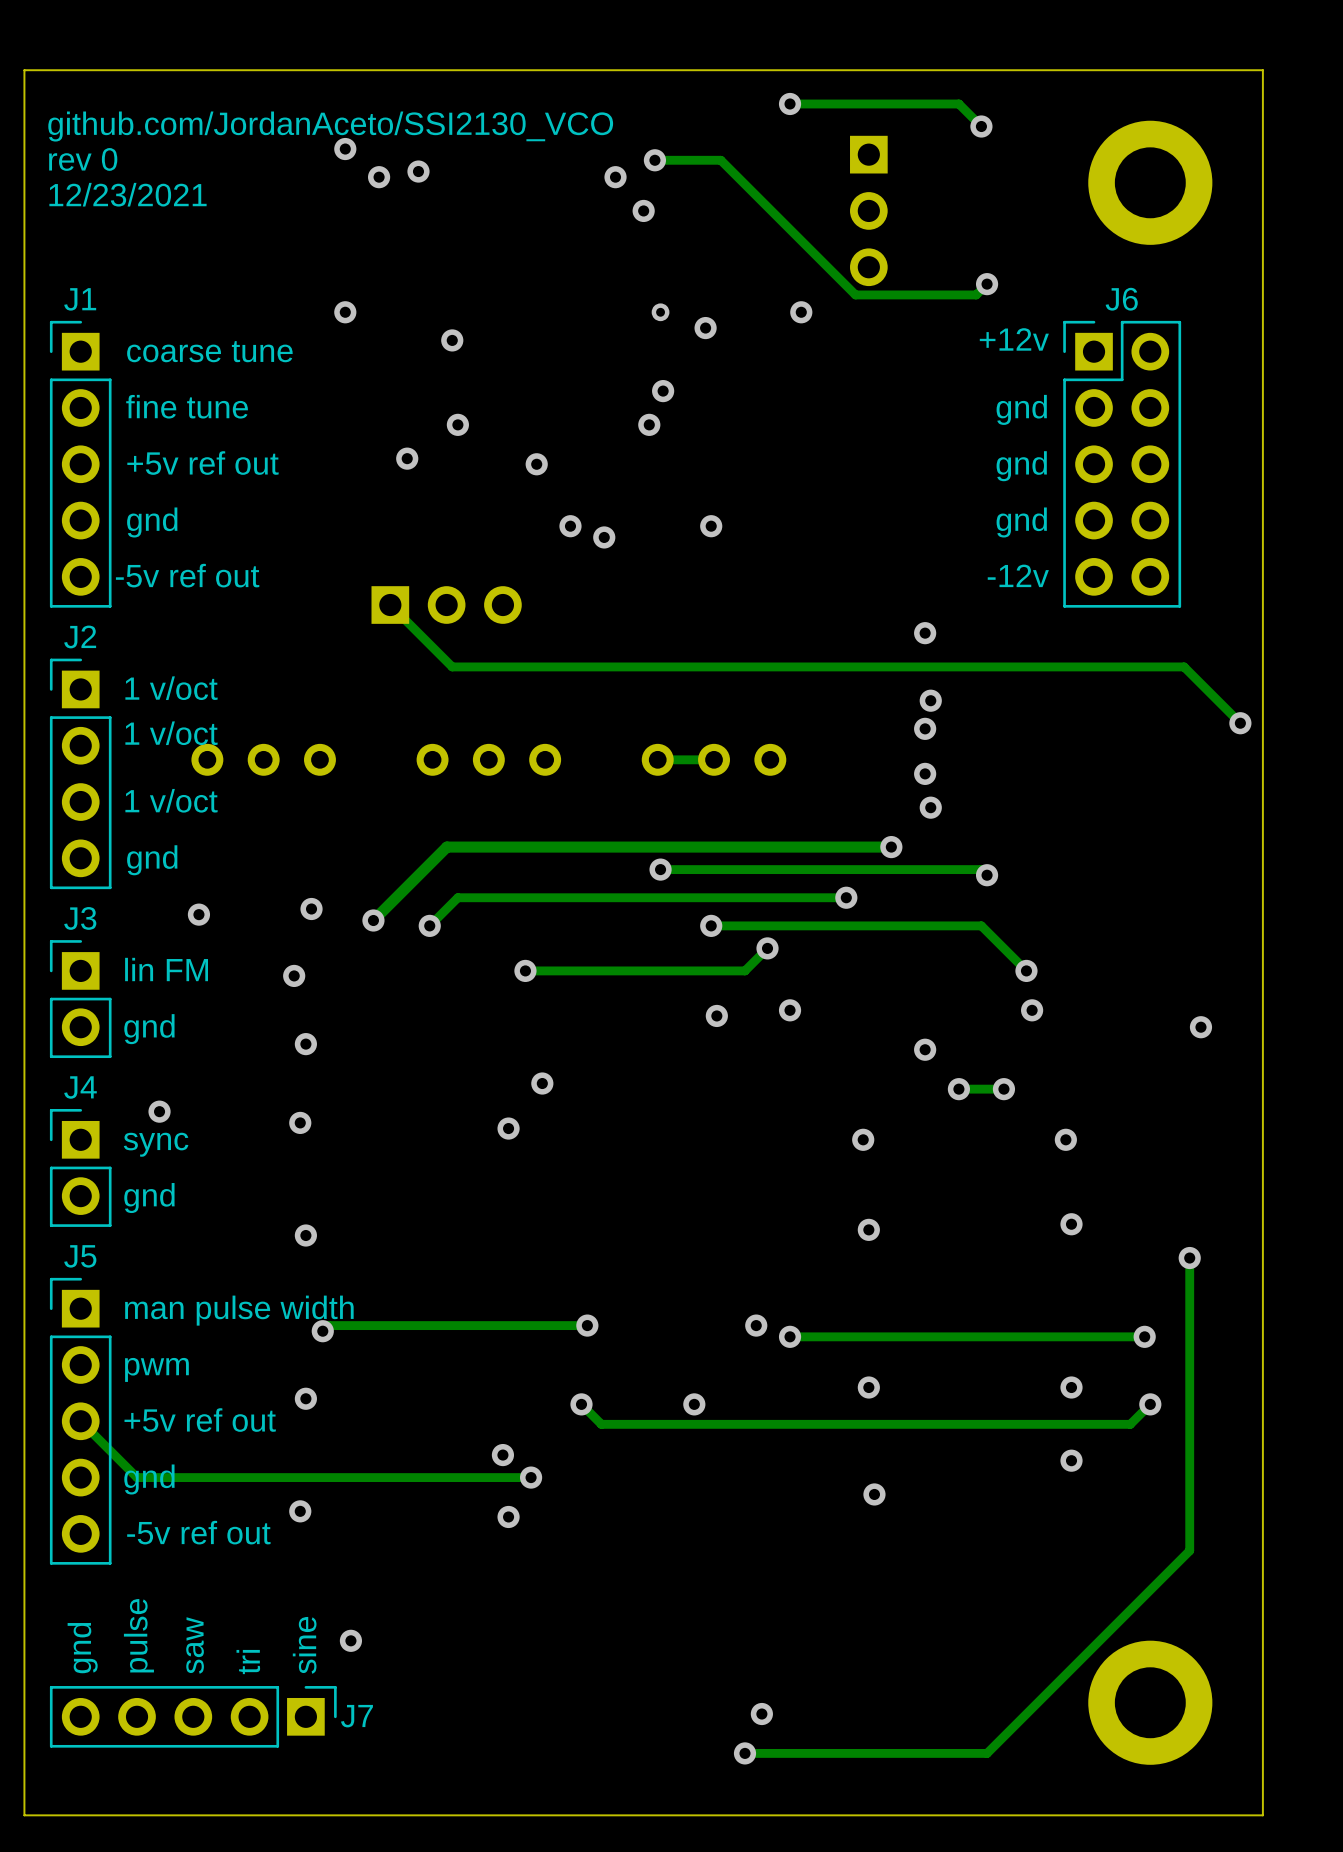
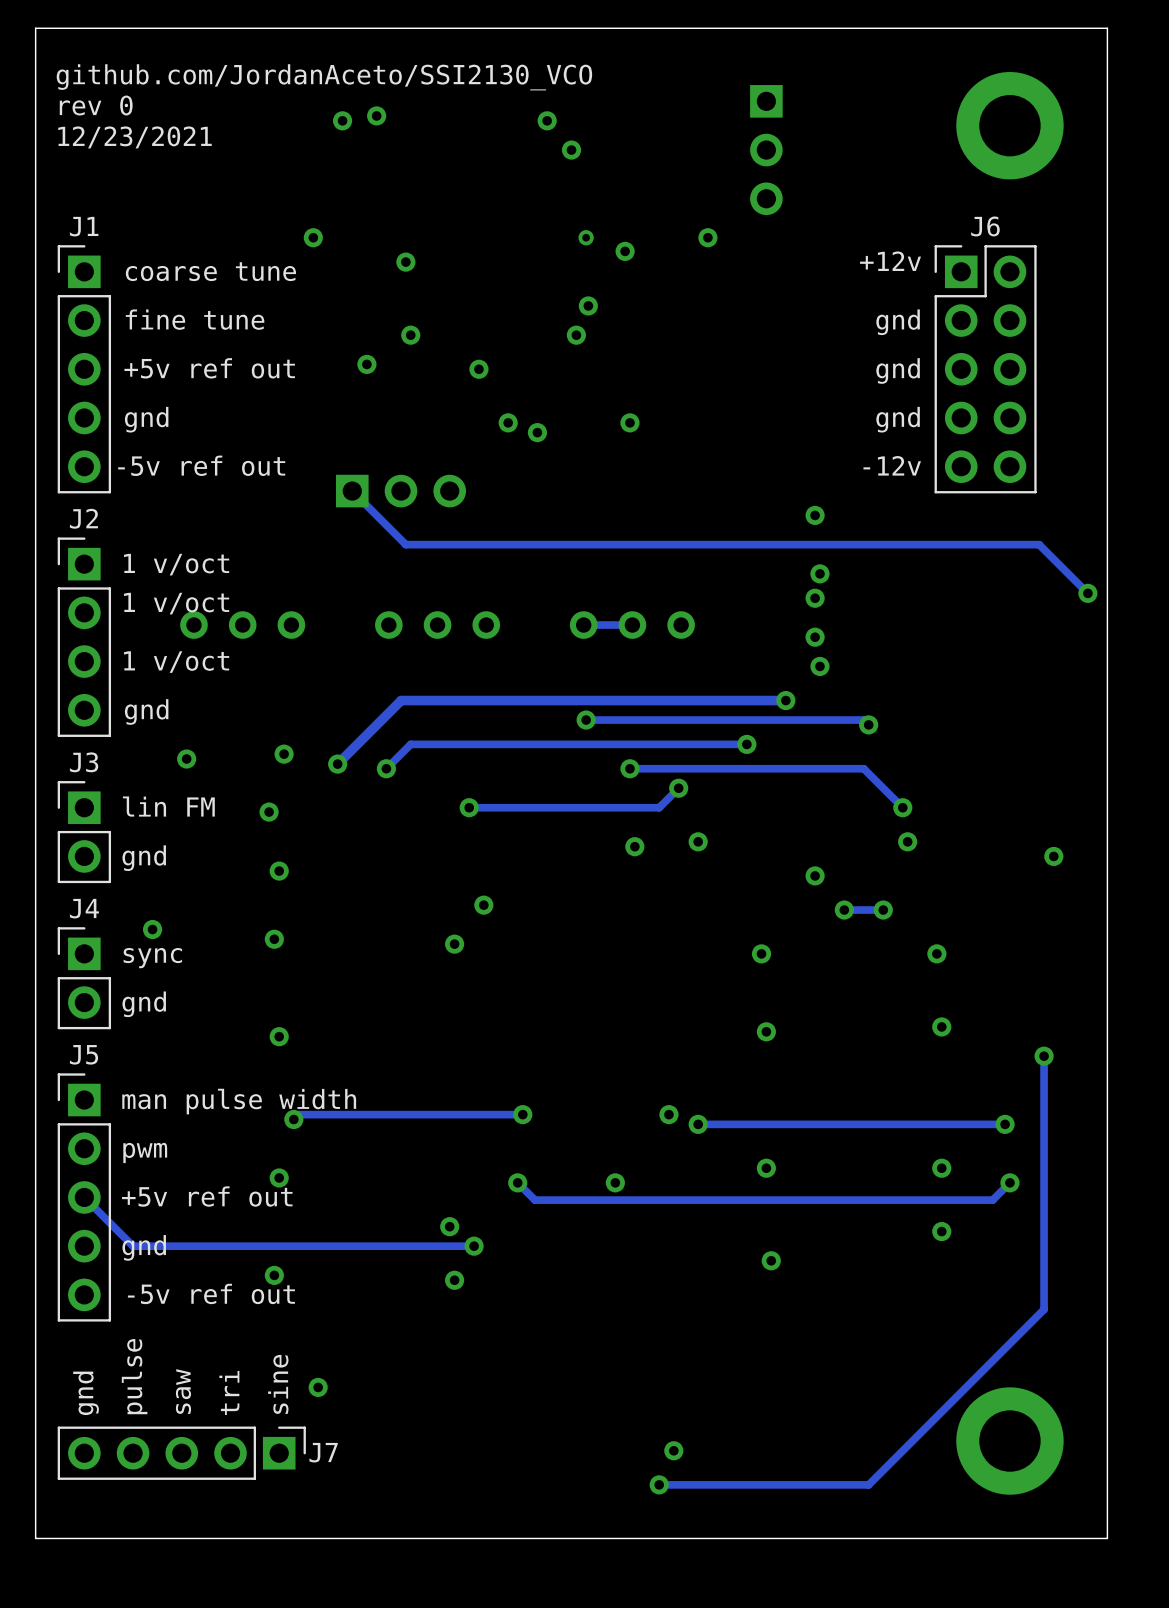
track: (790, 103) (958, 103) (981, 126) -> none
via: (790, 103) -> none
via: (981, 126) -> none
via: (345, 149) -> none
track: (654, 160) (720, 160) (855, 294) (976, 294) (987, 284) -> none
via: (654, 160) -> none
via: (987, 284) -> none

